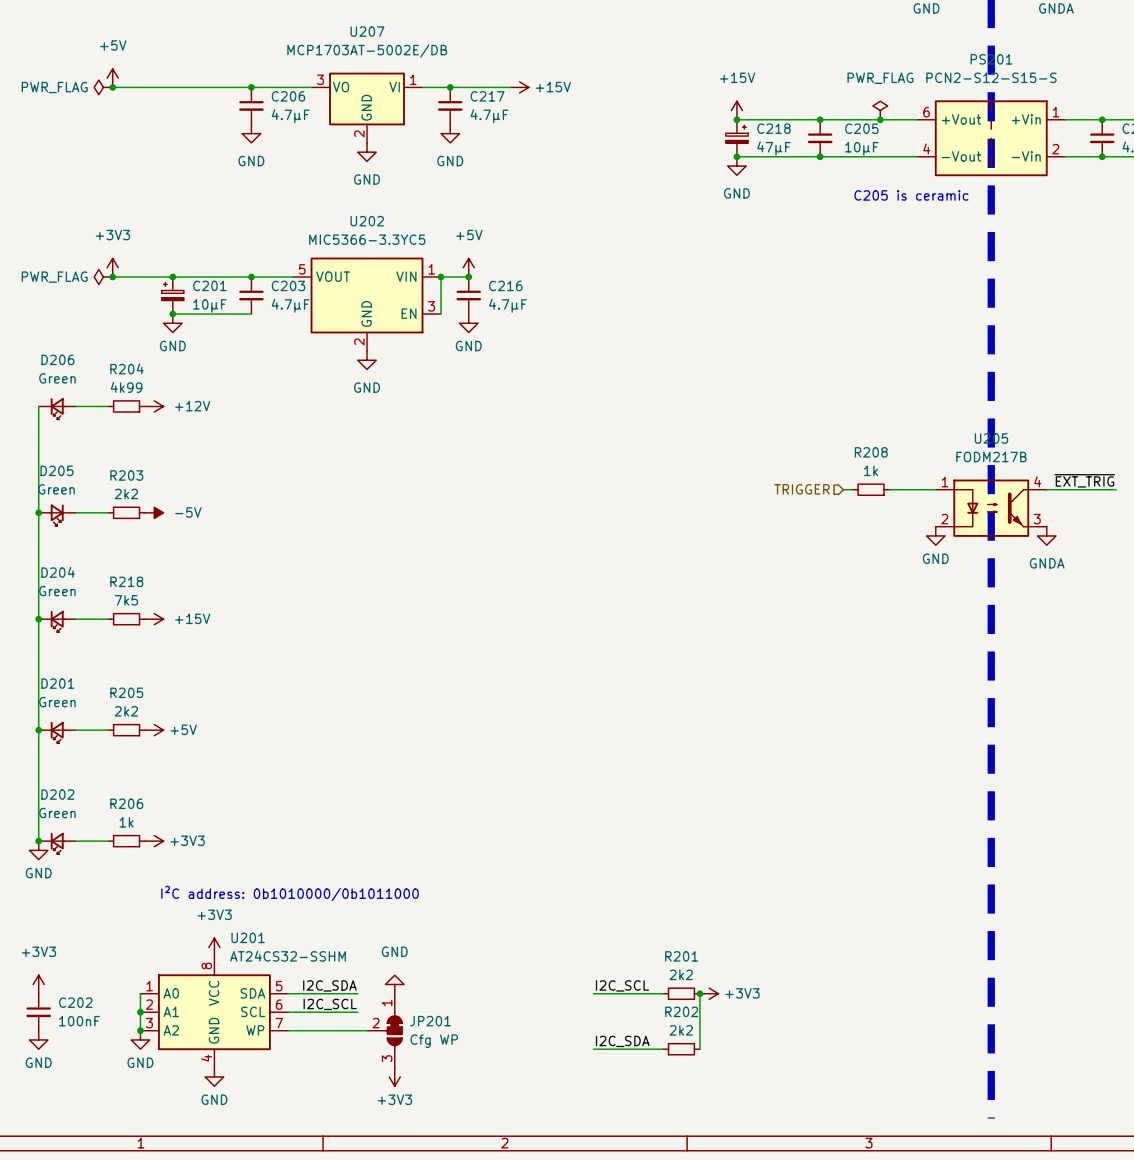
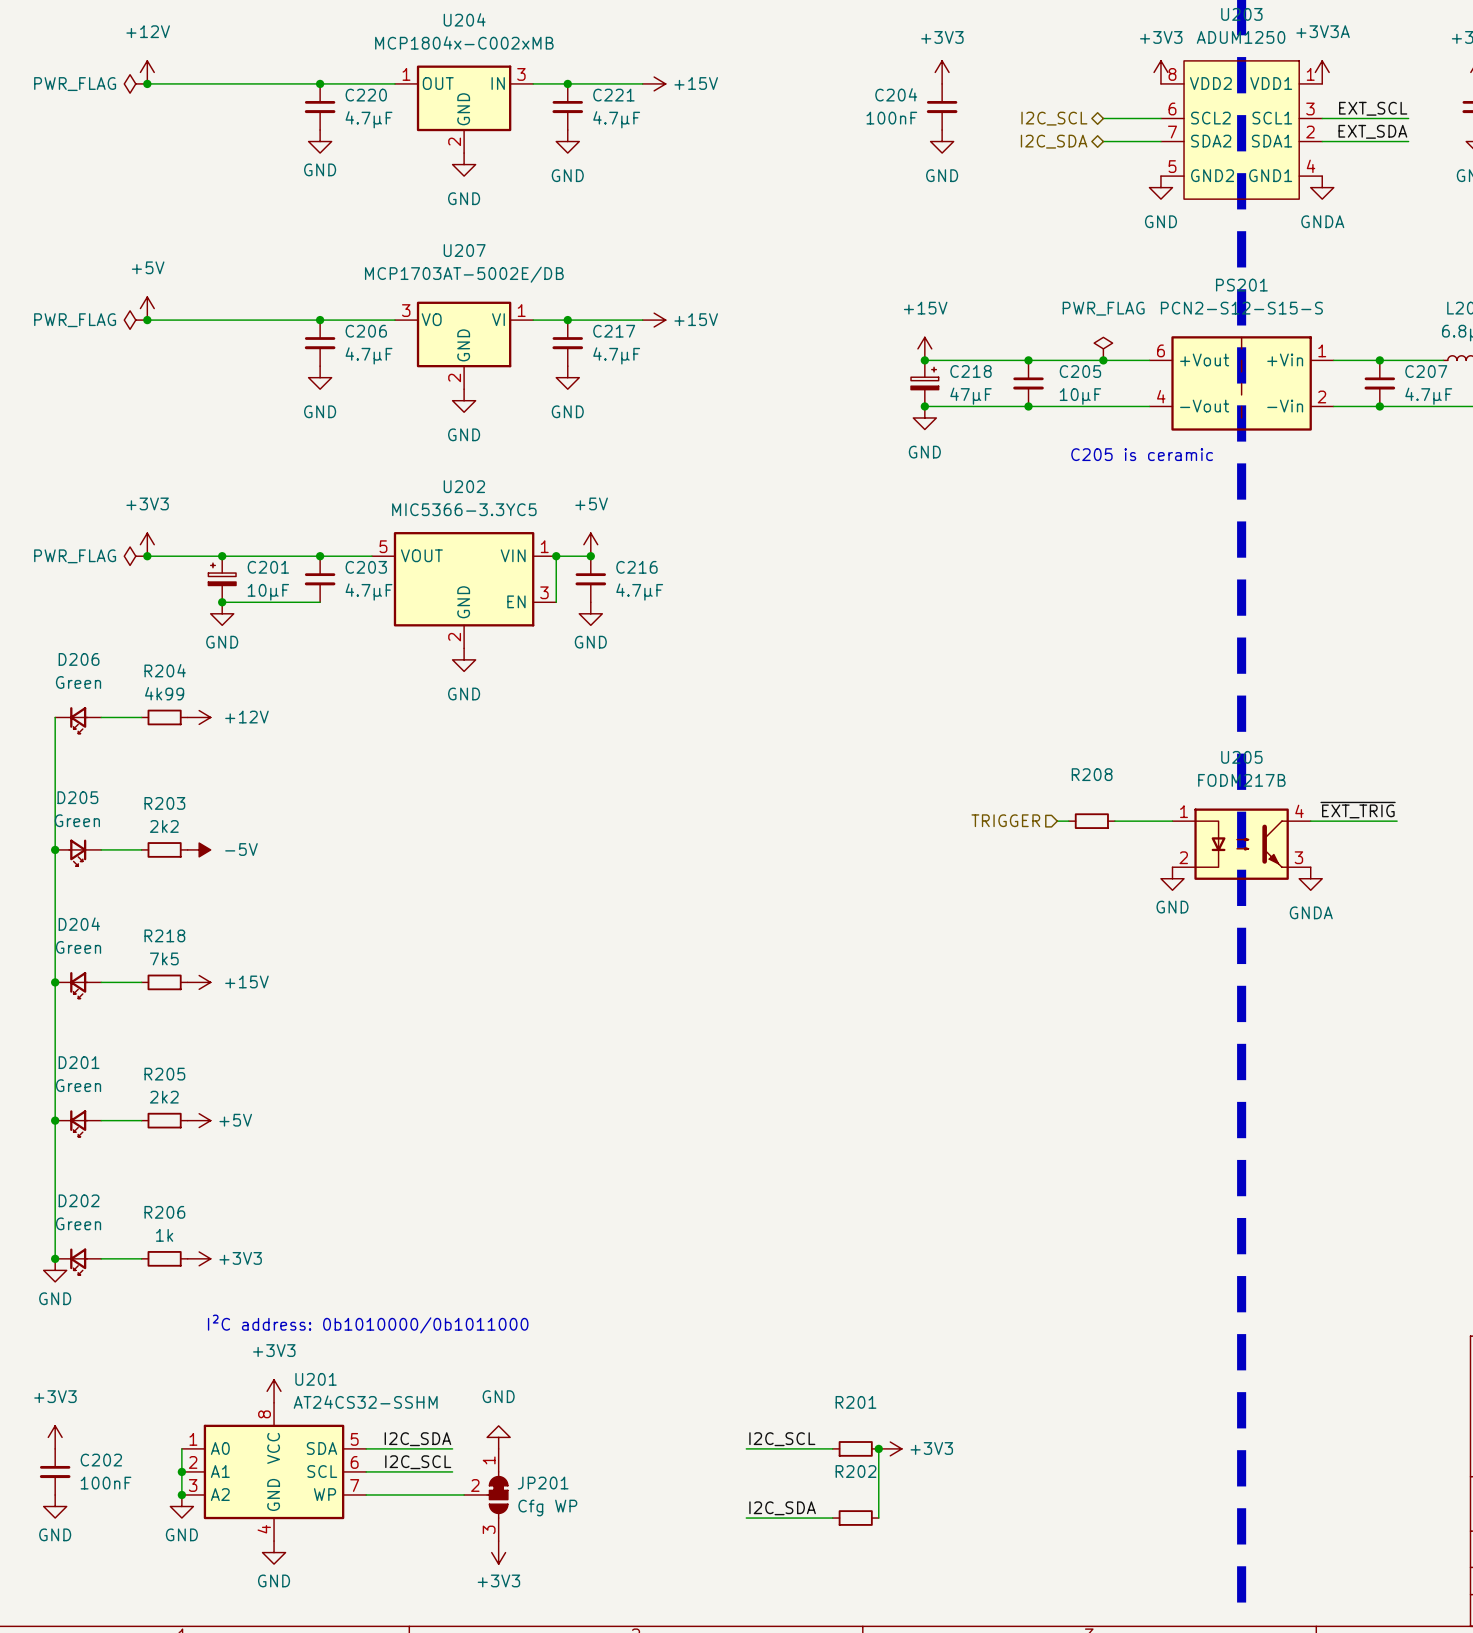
R208 value: 1k (871, 470) -> none
R201 value: 2k2 (681, 974) -> none
R202 value: 2k2 (681, 1030) -> none

